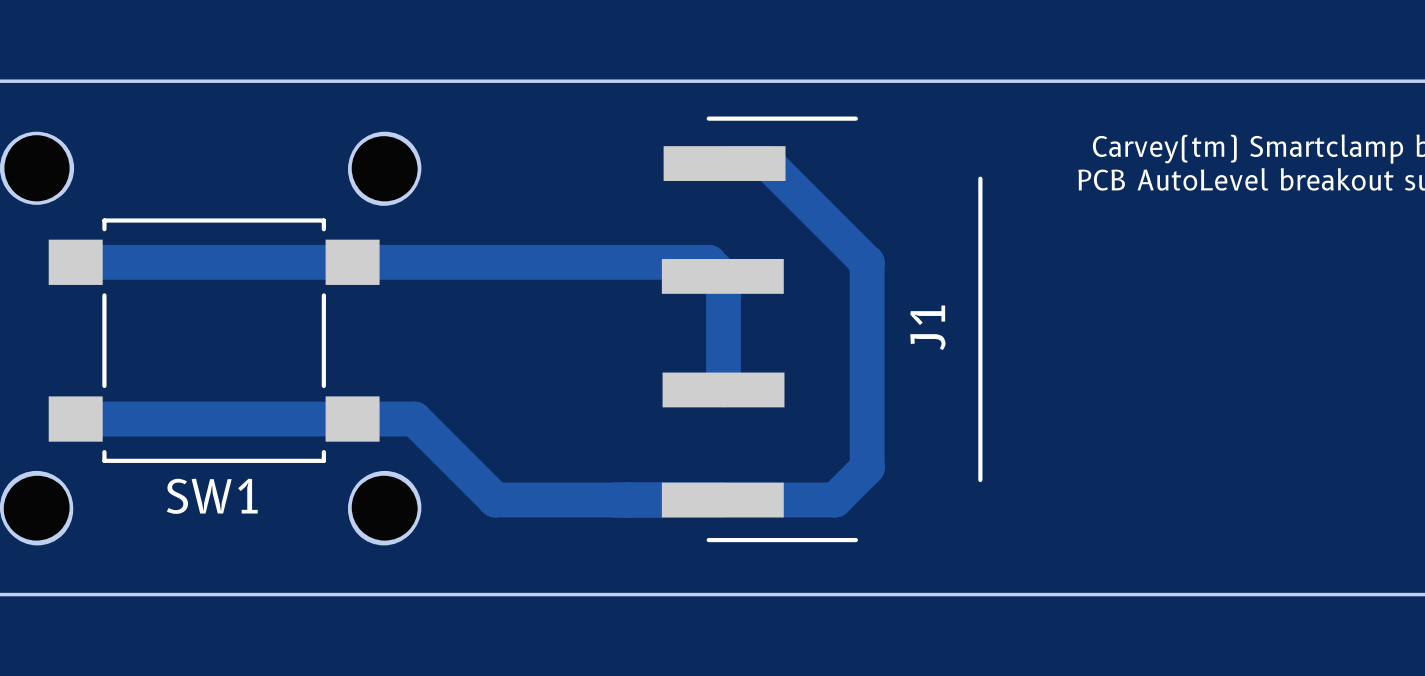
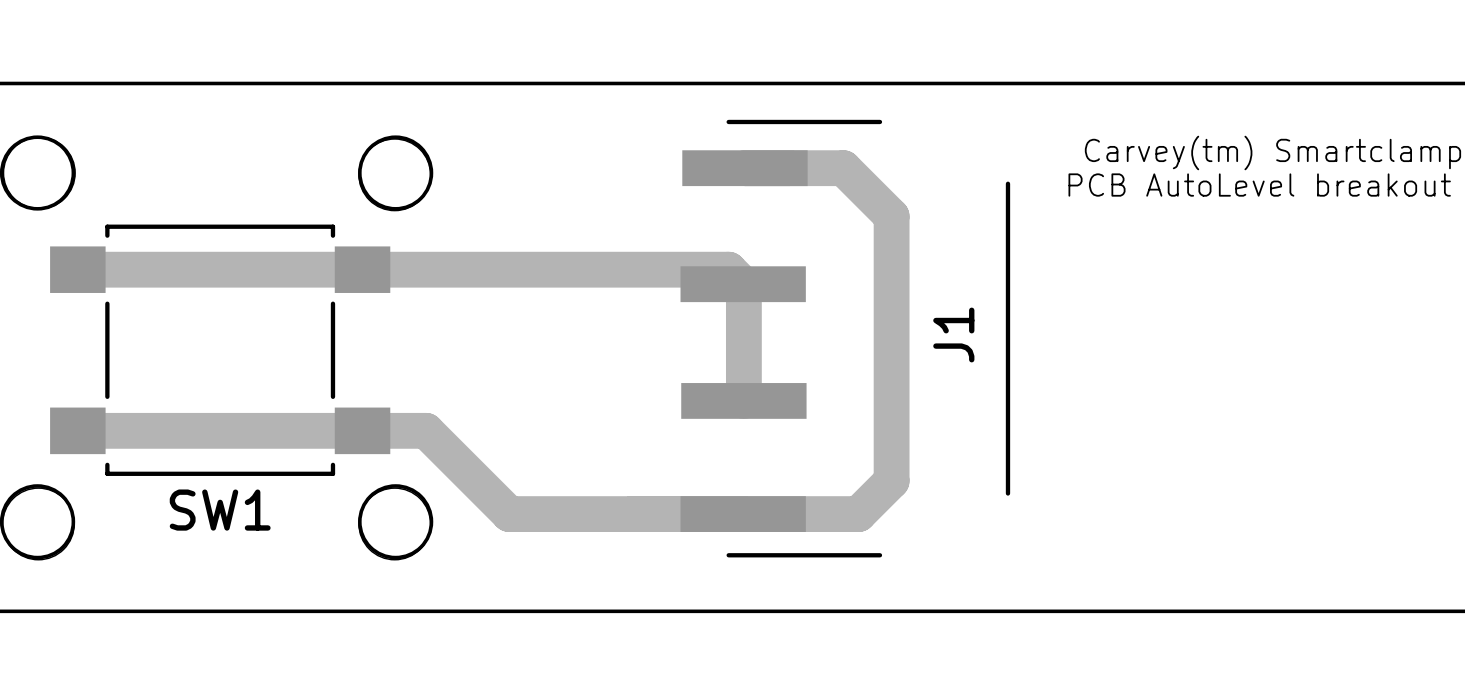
track: (768, 163) (867, 262) -> (789, 168) (843, 168) (891, 216) (891, 270)

